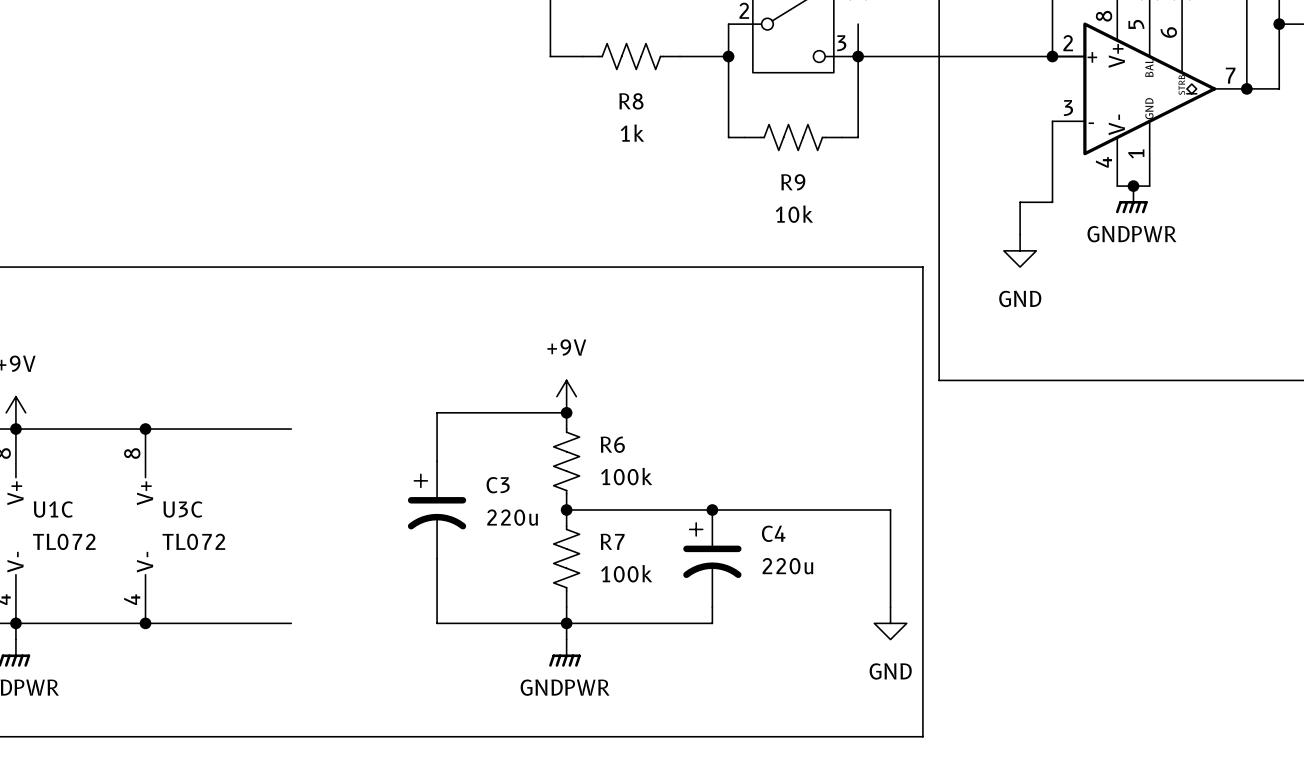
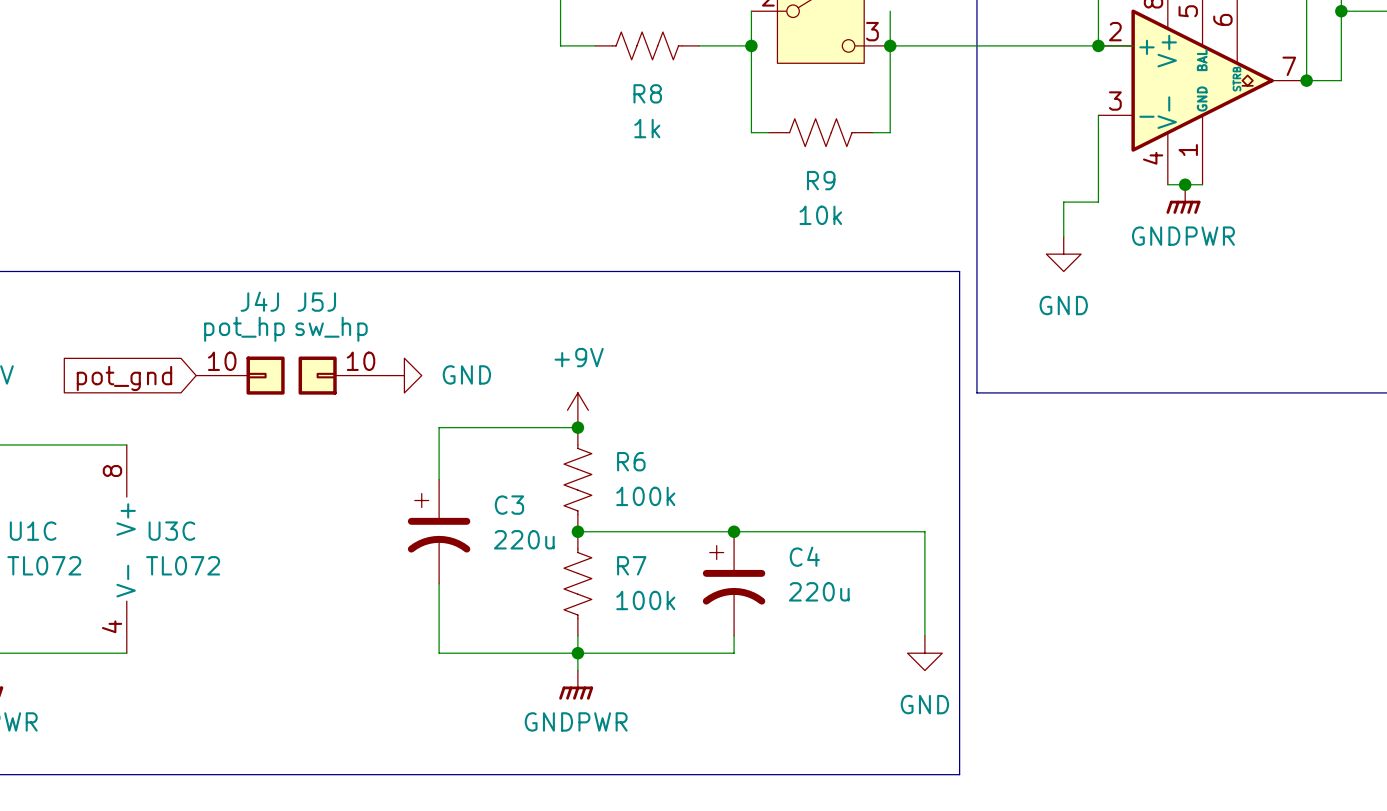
J4J: none -> pot_hp (240, 375)
J5J: none -> sw_hp (342, 375)
power symbol: none -> GND (404, 375)
global label: none -> pot_gnd (124, 378)
wire: (145, 429) (291, 429) -> none
junction: (145, 429) -> none
wire: (145, 623) (291, 623) -> none
junction: (145, 623) -> none

